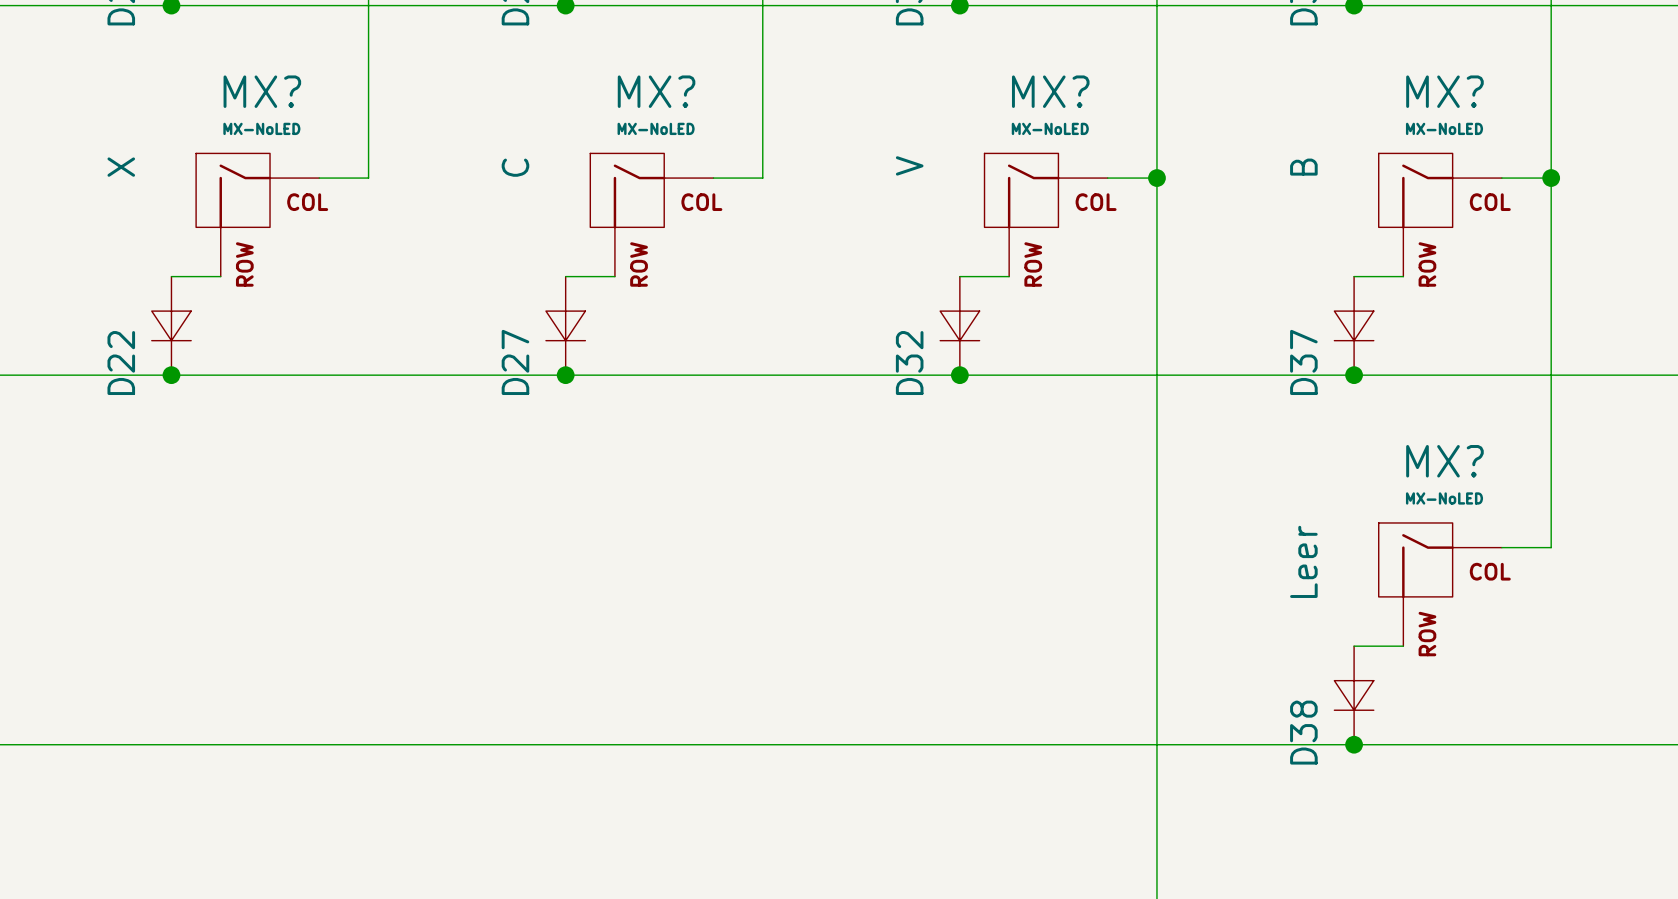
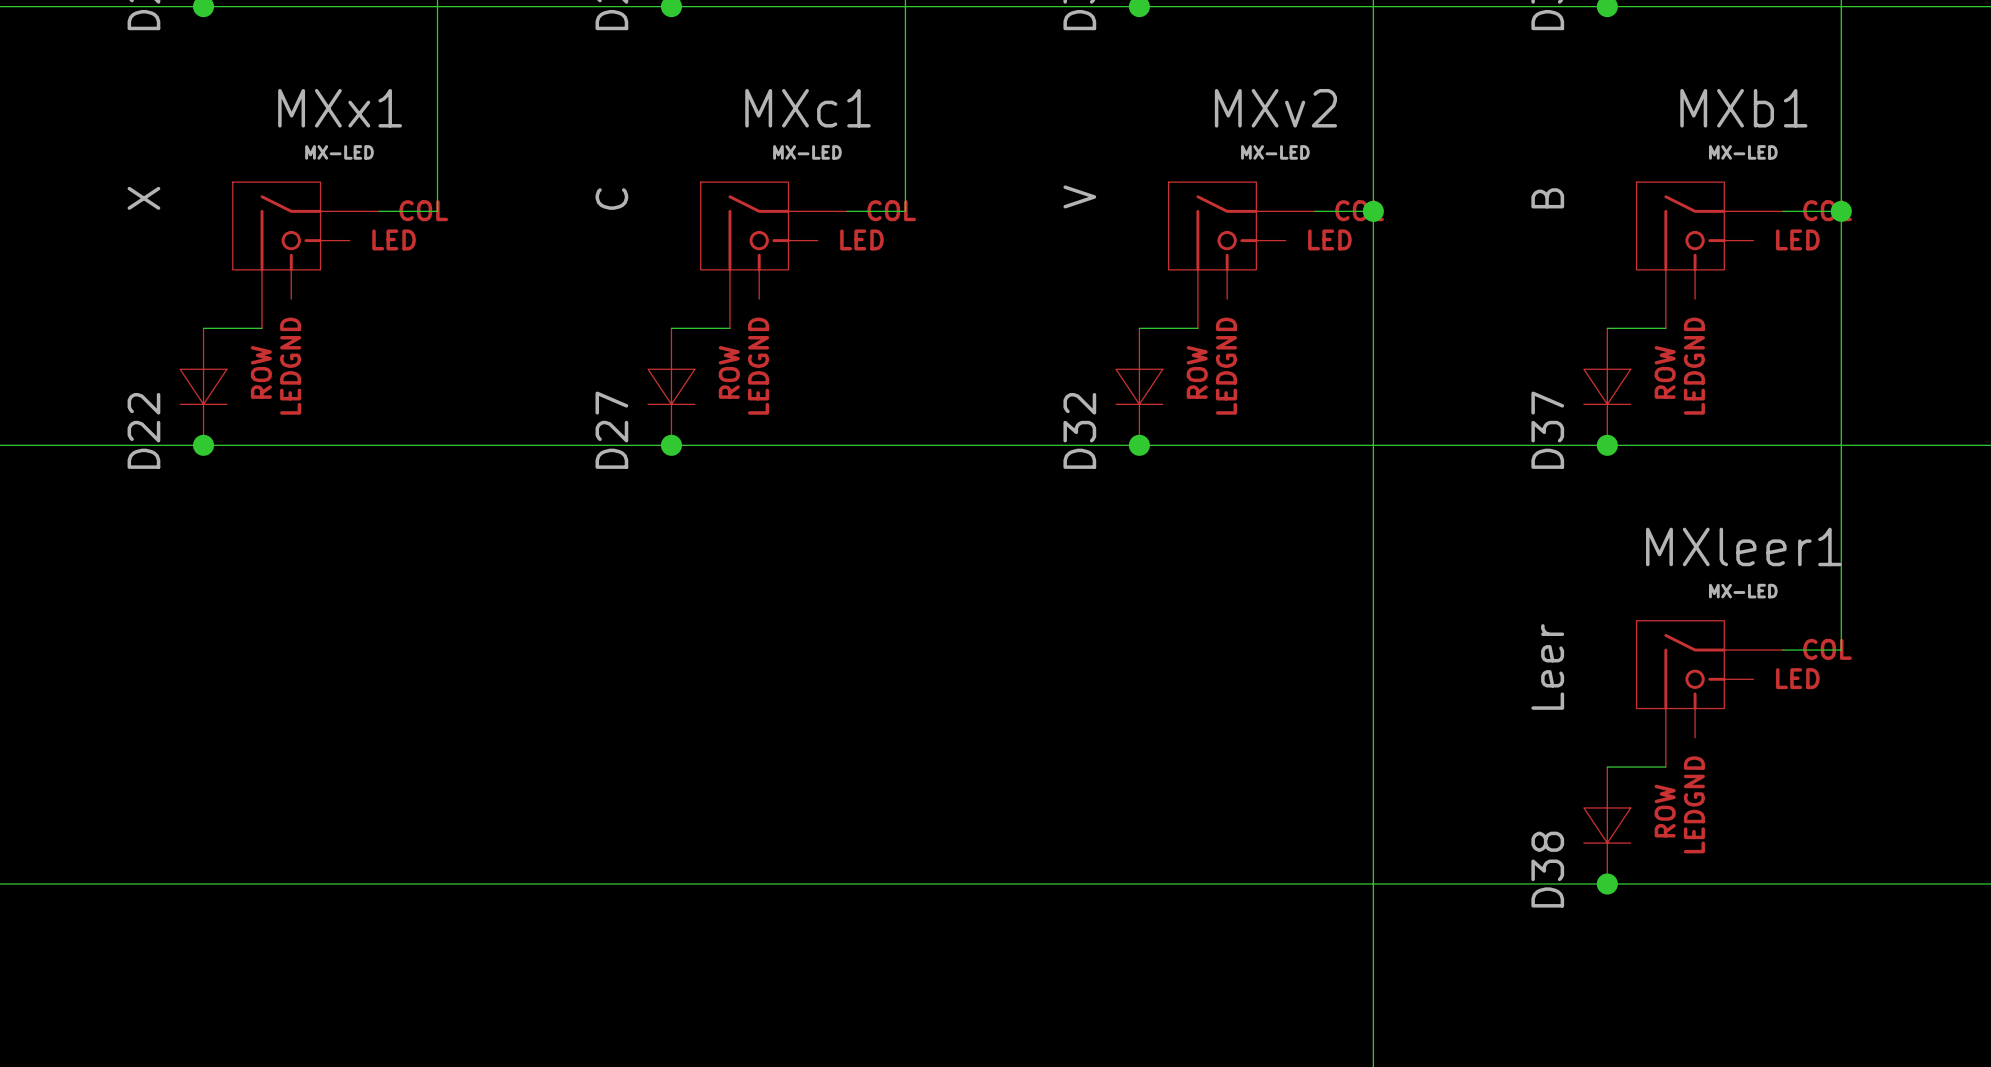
MX?: MX-NoLED (257, 215) -> none
MXx1: none -> MX-LED (305, 255)
MX?: MX-NoLED (651, 215) -> none
MXc1: none -> MX-LED (773, 255)
MX?: MX-NoLED (1046, 215) -> none
MXv2: none -> MX-LED (1241, 255)
MX?: MX-NoLED (1440, 215) -> none
MXb1: none -> MX-LED (1709, 255)
MX?: MX-NoLED (1440, 584) -> none
MXleer1: none -> MX-LED (1709, 693)

